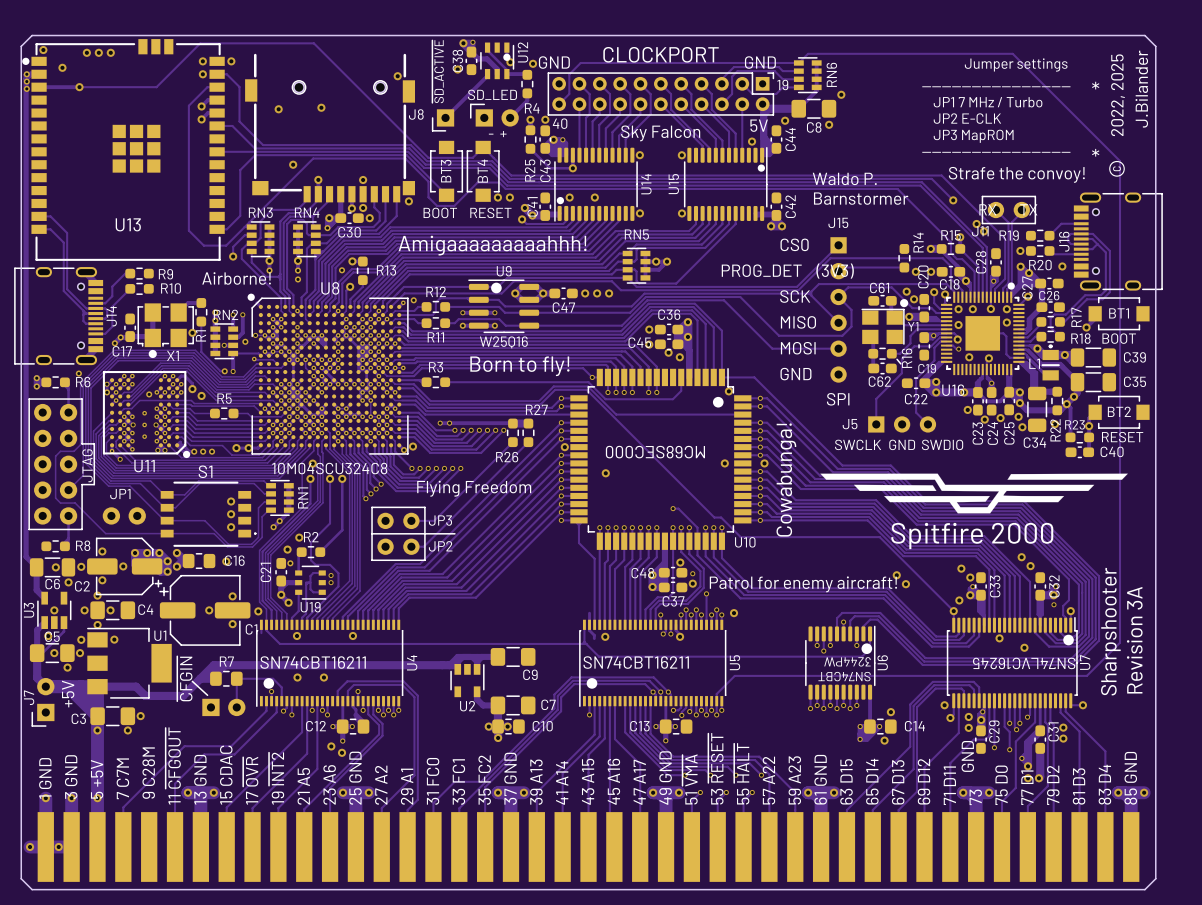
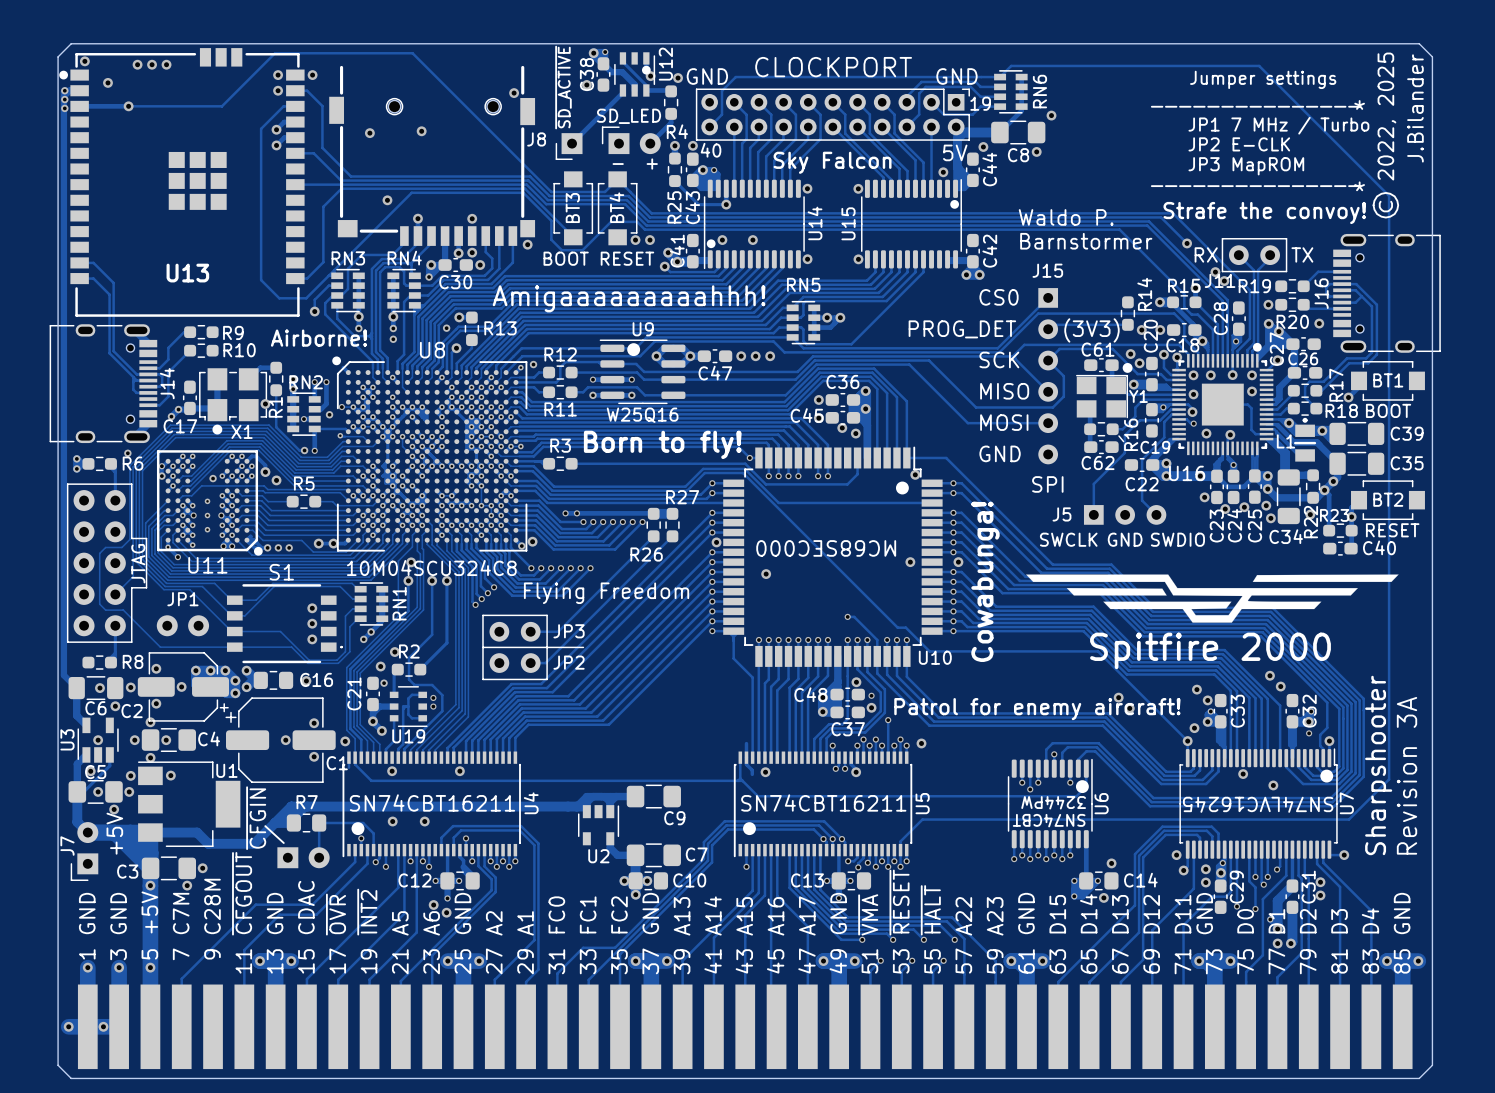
via: (289, 384) -> none
via: (289, 392) -> none
via: (289, 400) -> none

